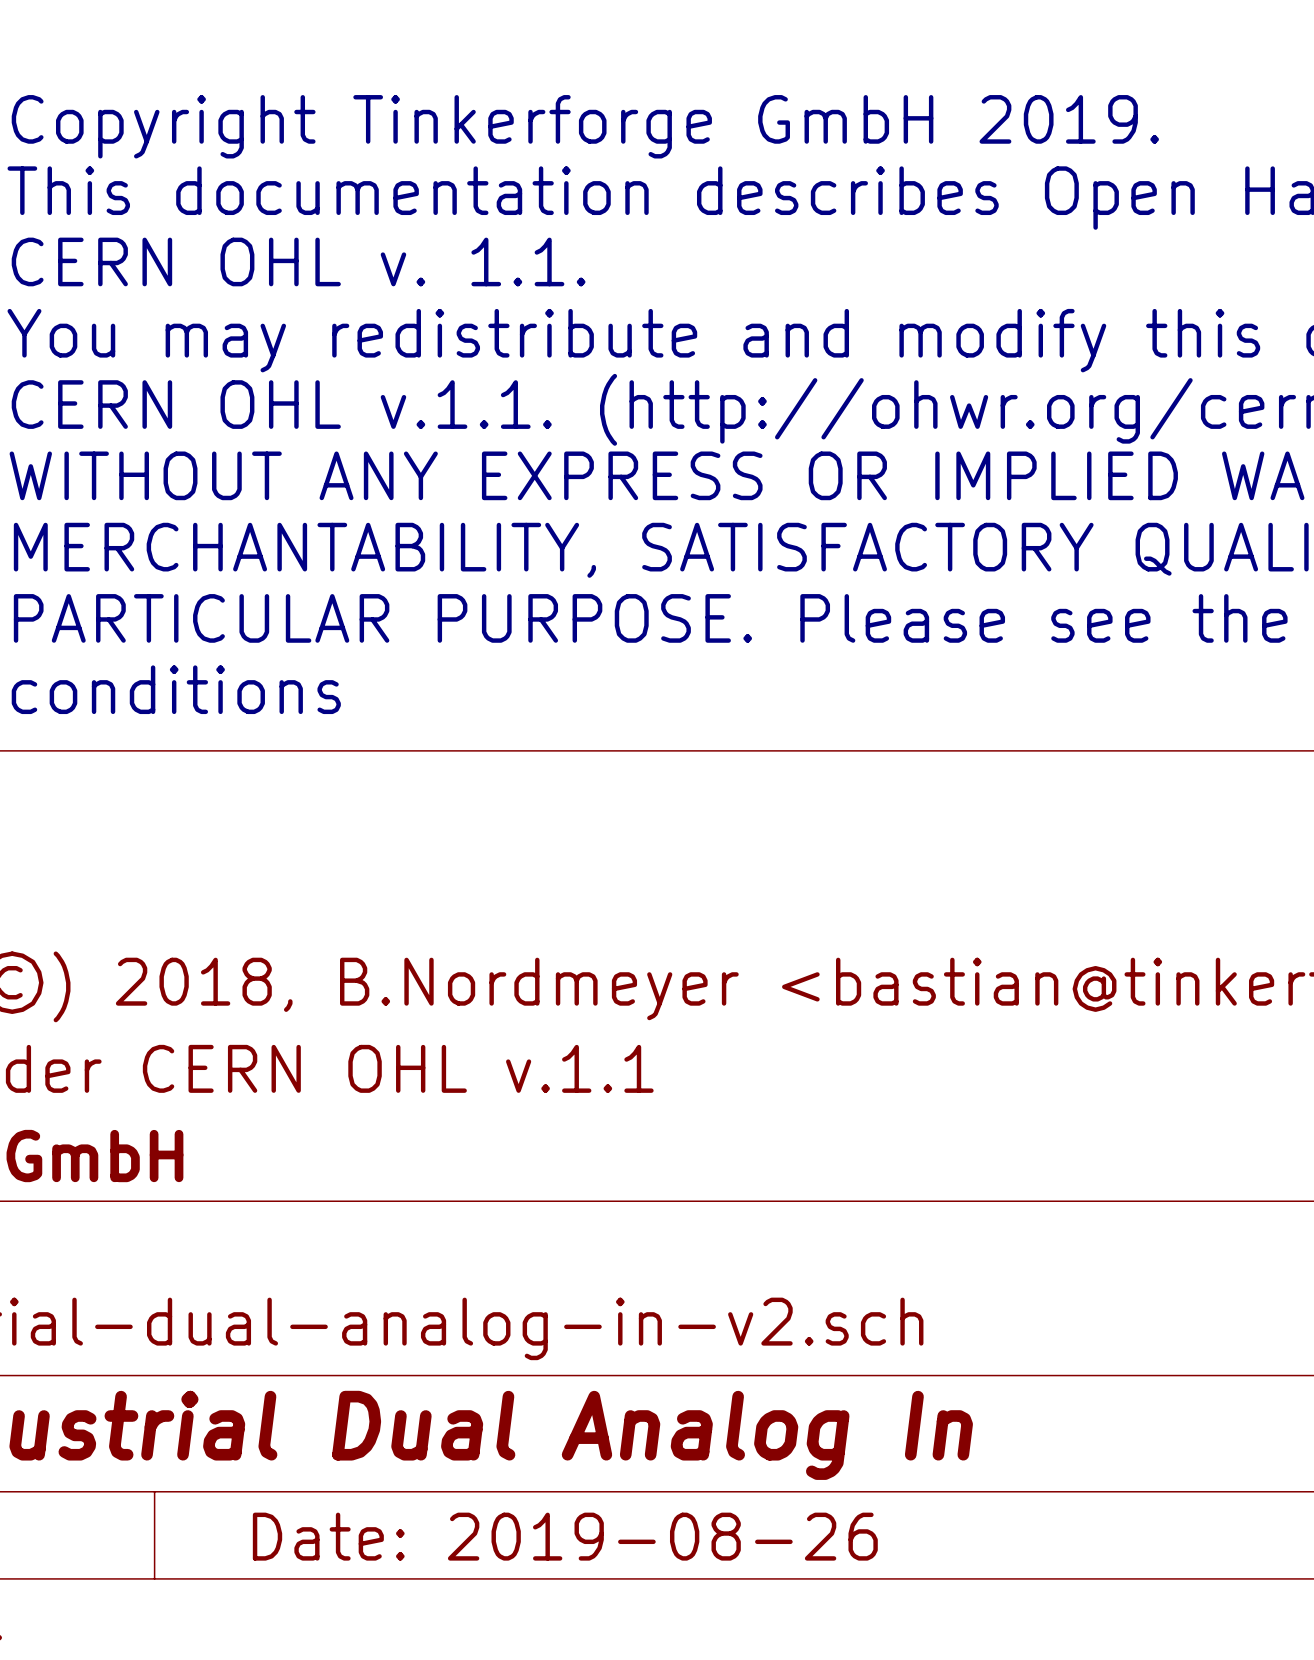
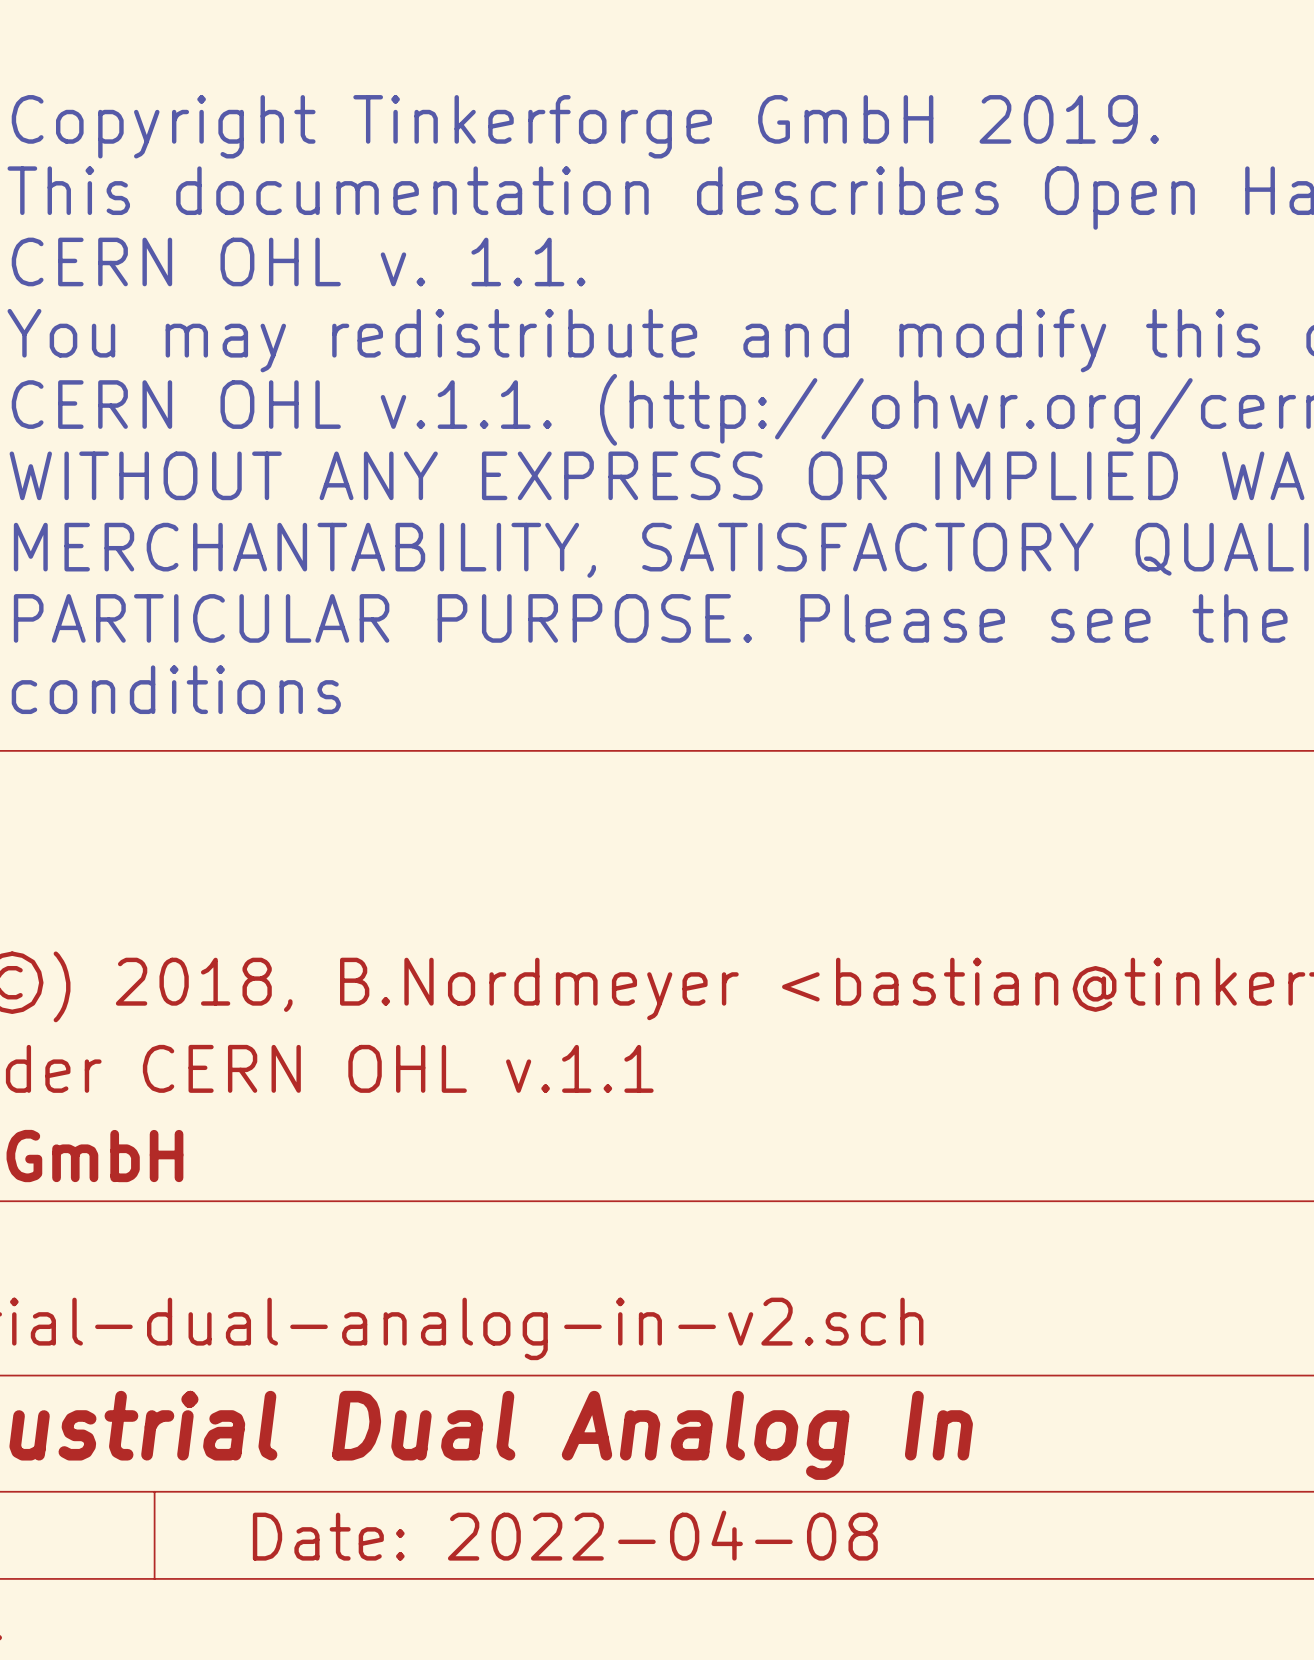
title block: Date: 2019-08-26 (565, 1536) -> Date: 2022-04-08 (565, 1535)

